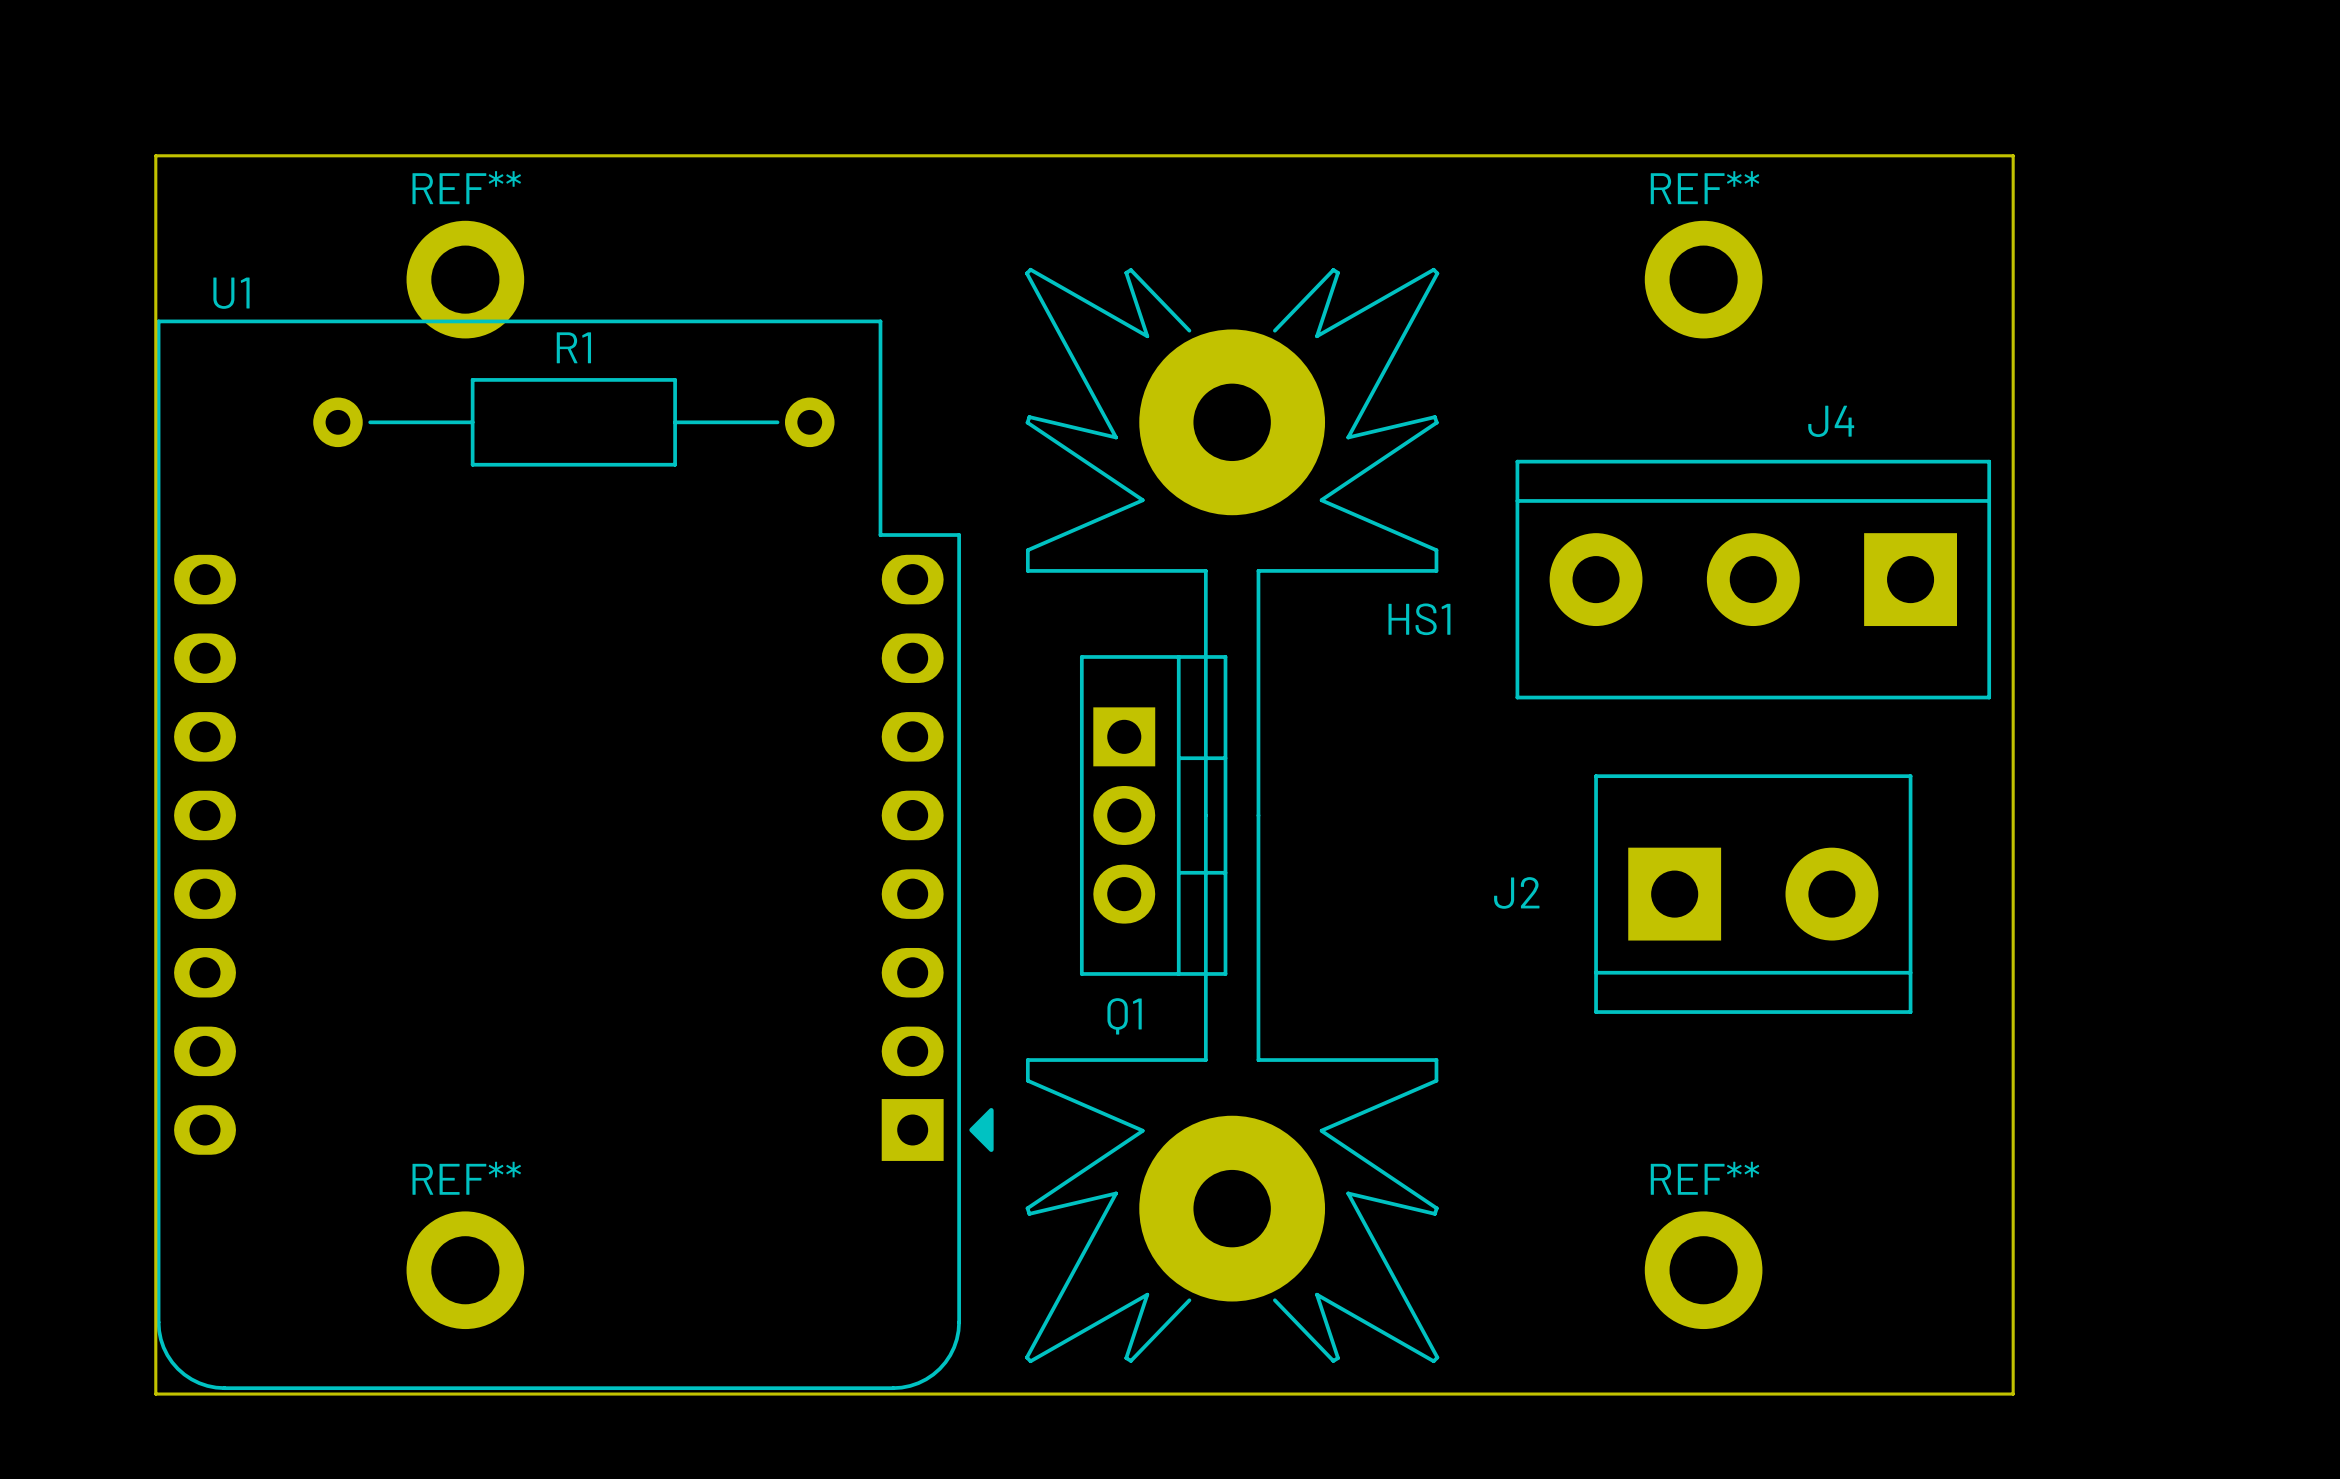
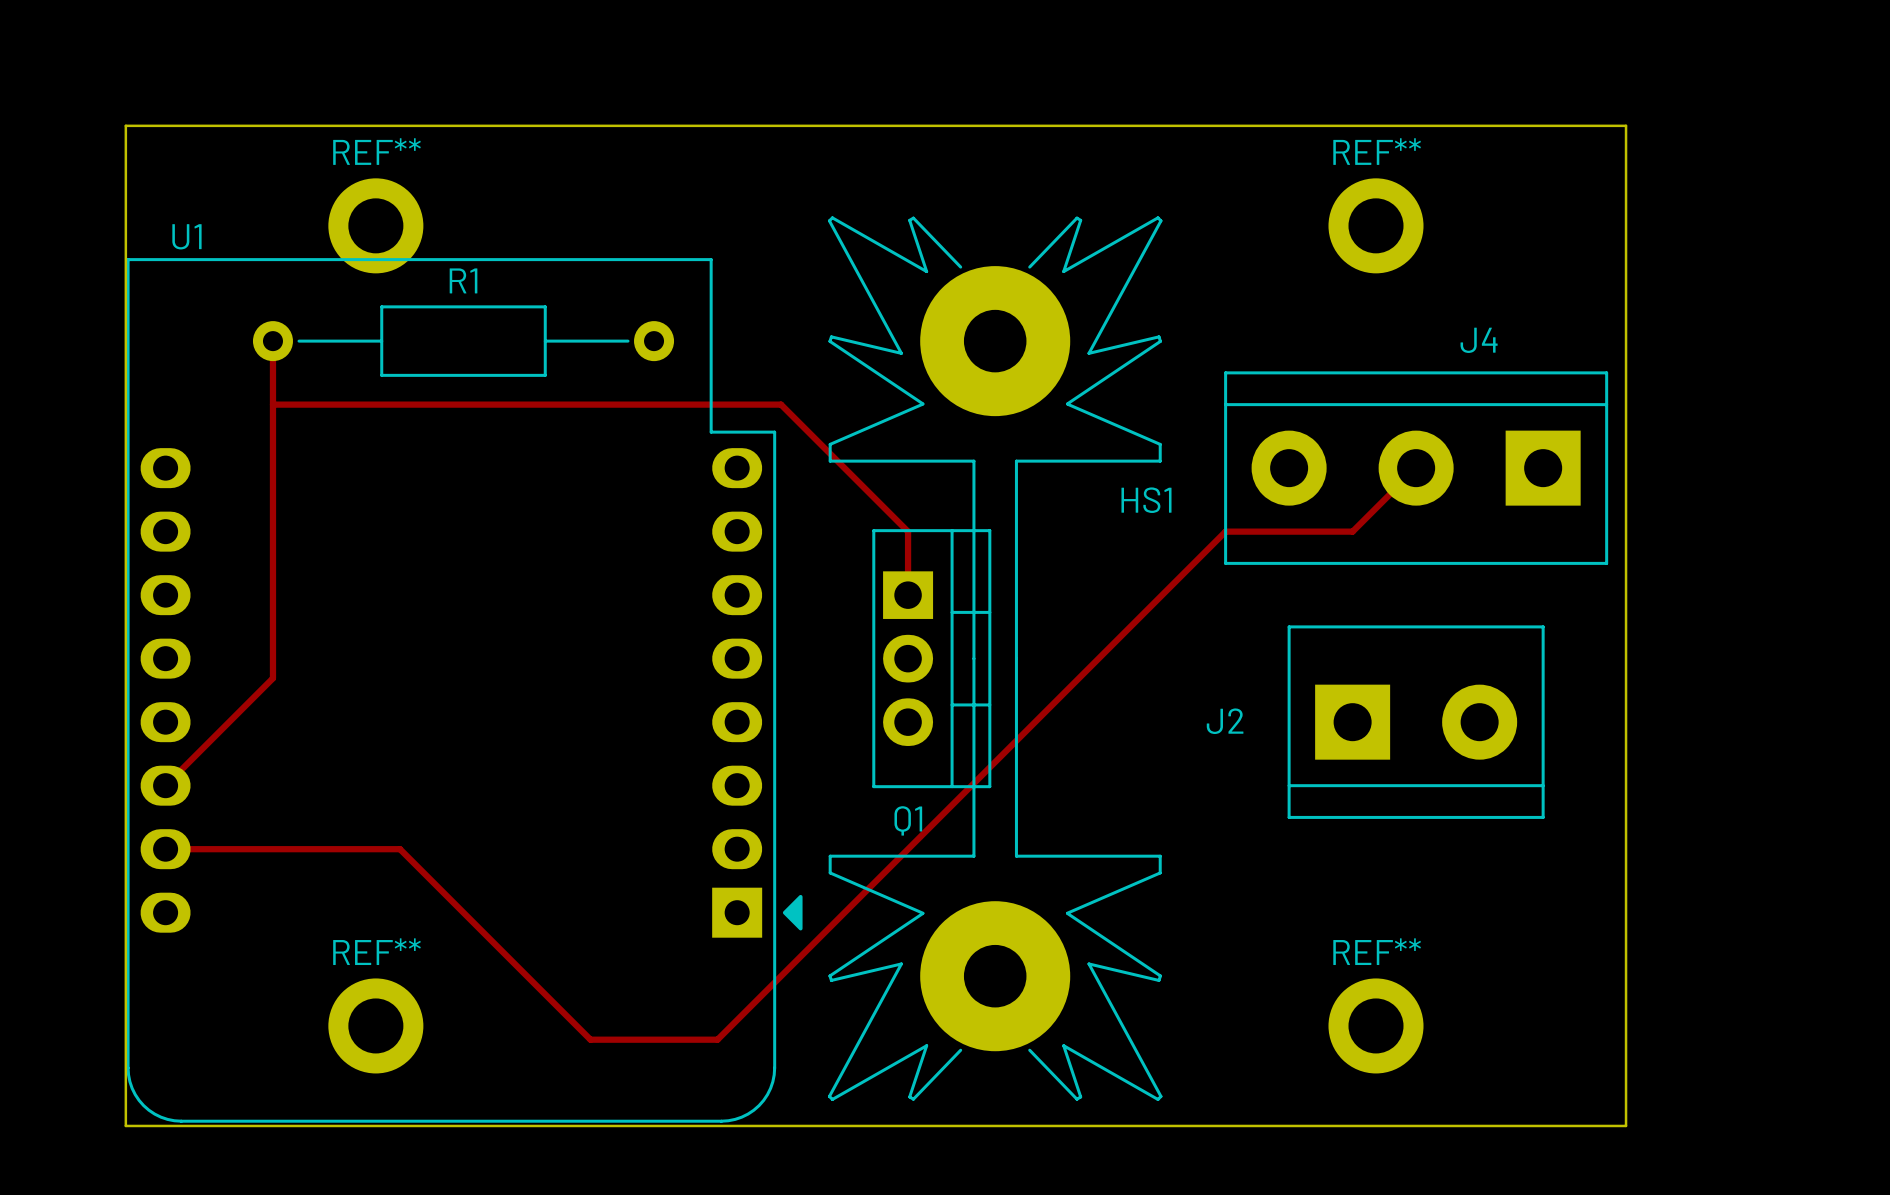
track: none -> (272, 341) (272, 678) (165, 785)
track: none -> (272, 404) (781, 404) (908, 531) (908, 595)
track: none -> (1416, 468) (1352, 531) (1225, 531) (717, 1039) (590, 1039) (399, 849) (165, 849)

